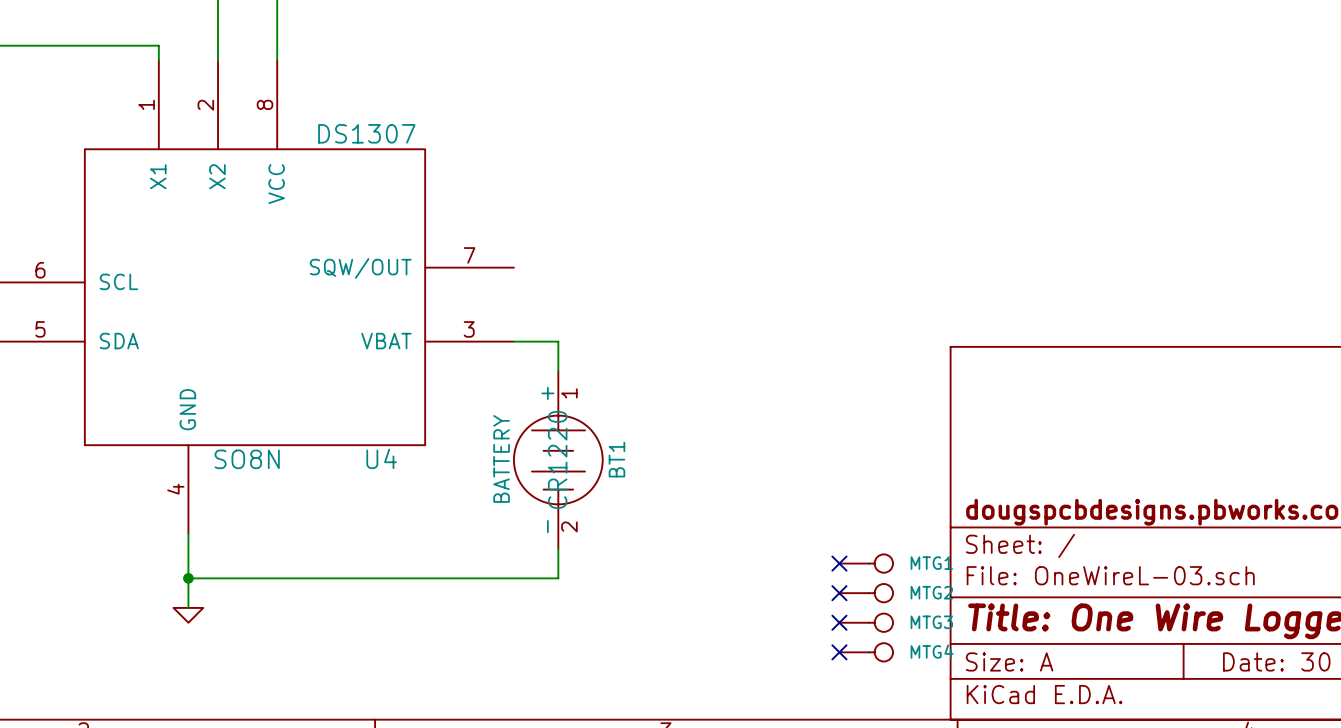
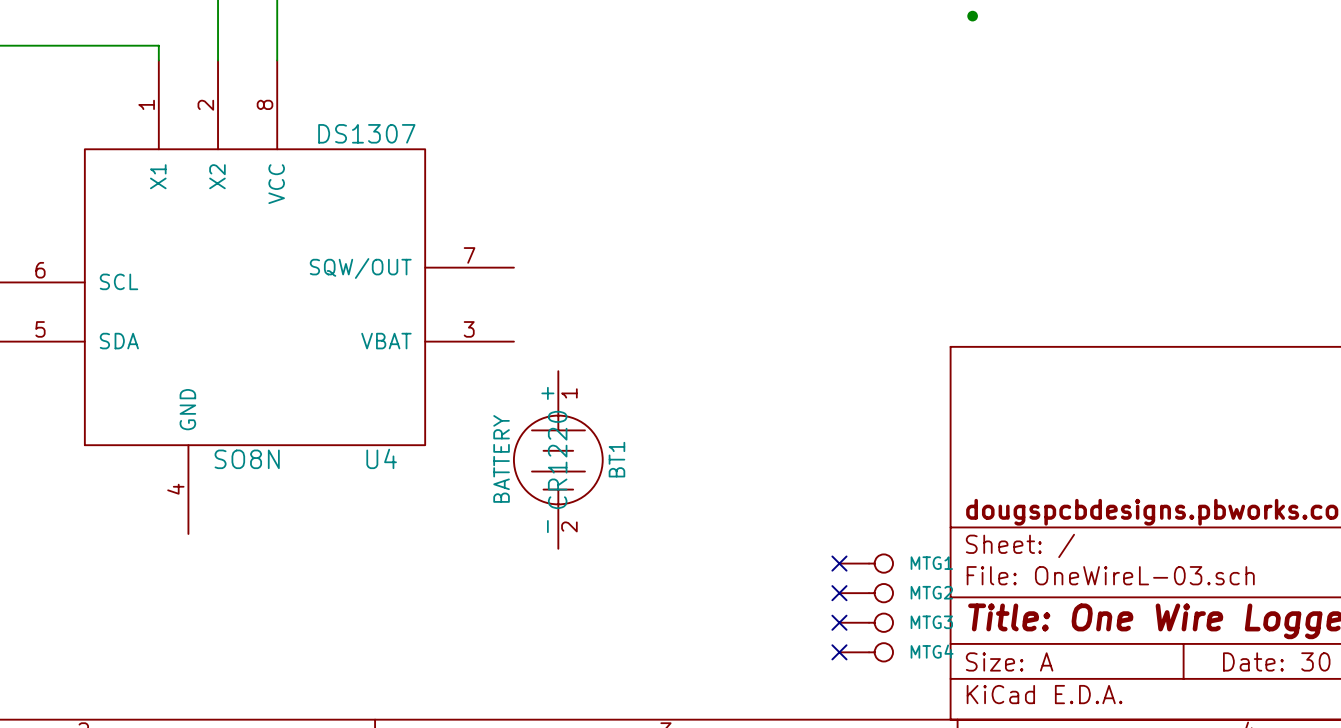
junction: none -> (972, 16)
wire: (513, 341) (558, 341) (558, 371) -> none
wire: (188, 533) (188, 607) -> none
wire: (558, 548) (558, 578) (188, 578) -> none
junction: (188, 578) -> none
power symbol: (188, 615) -> none

